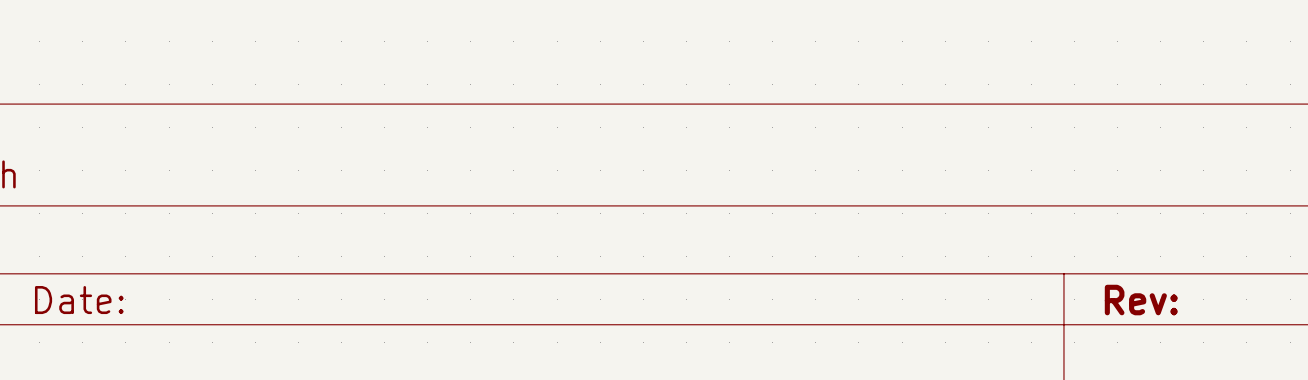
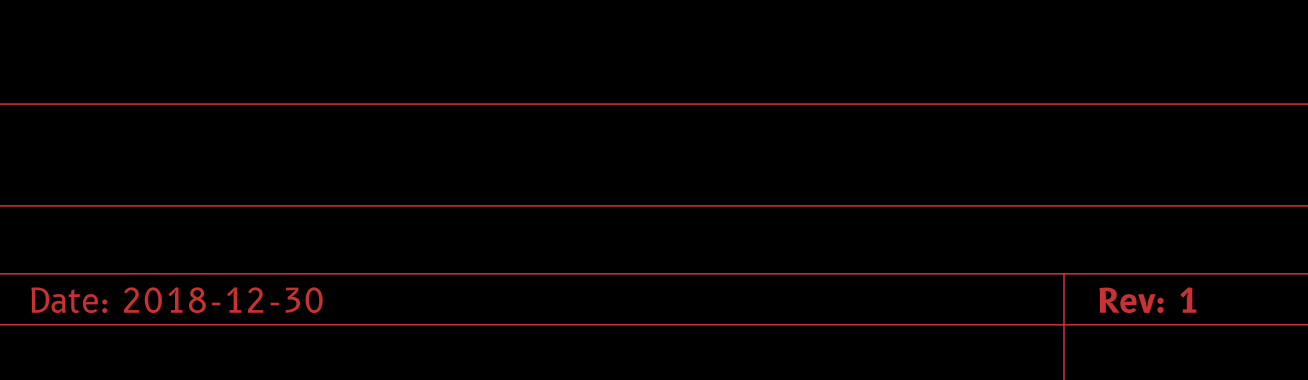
title block: Date: (79, 300) -> Date: 2018-12-30 (177, 300)
title block: Rev: (1141, 300) -> Rev: 1 (1147, 300)

